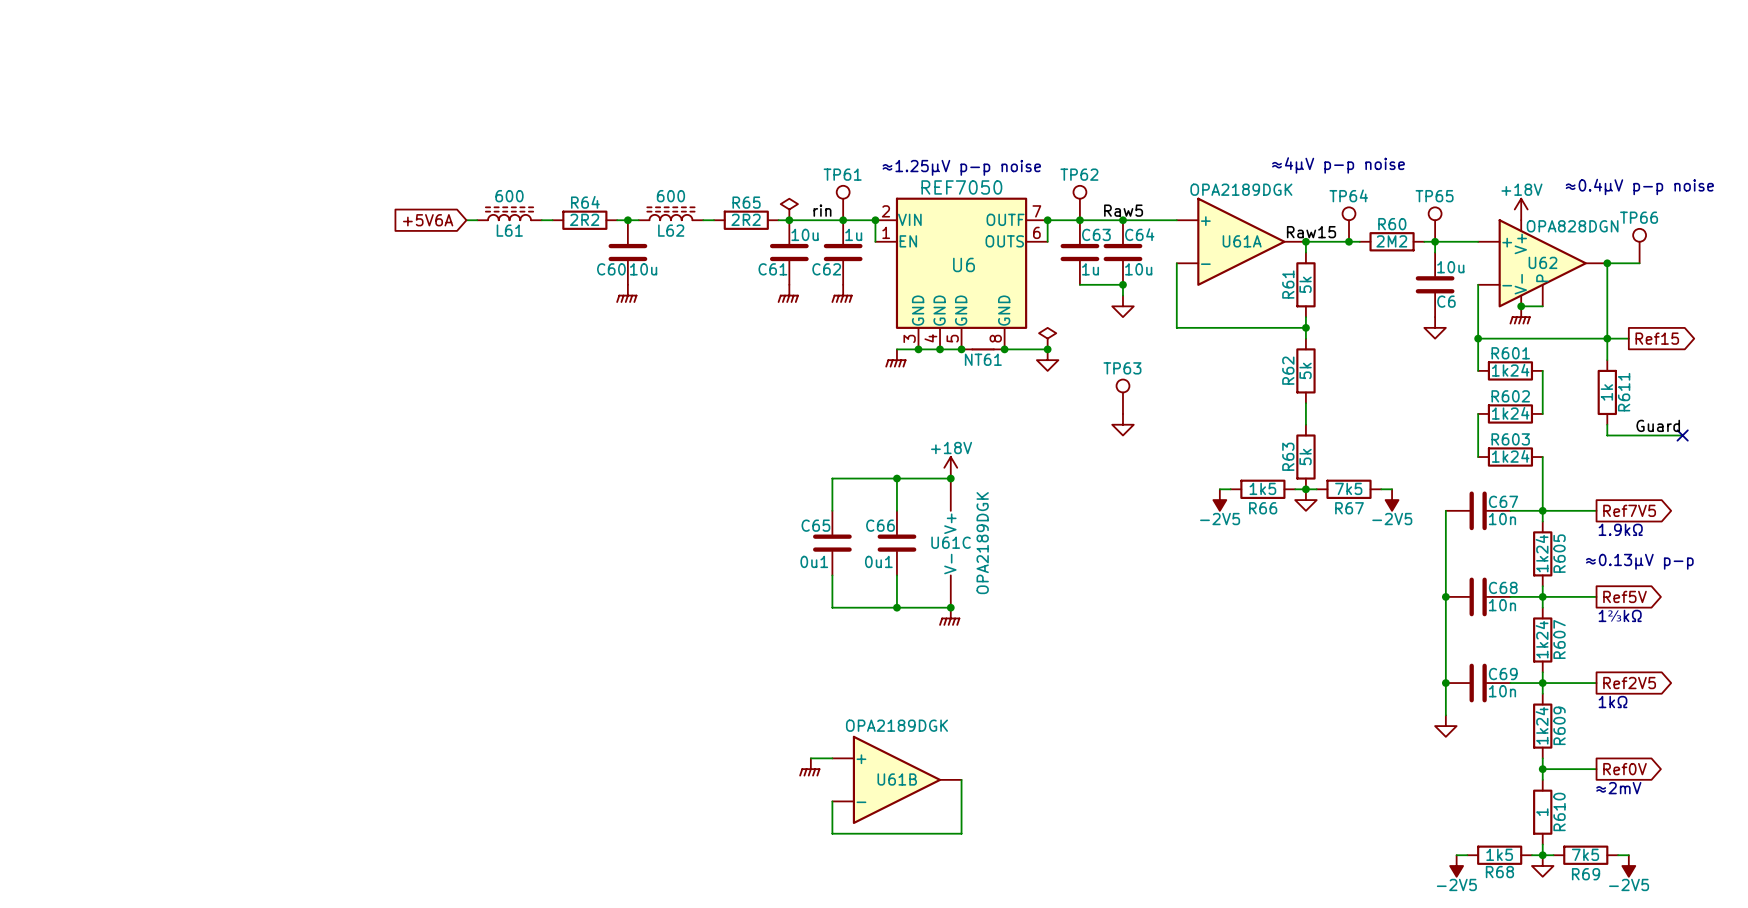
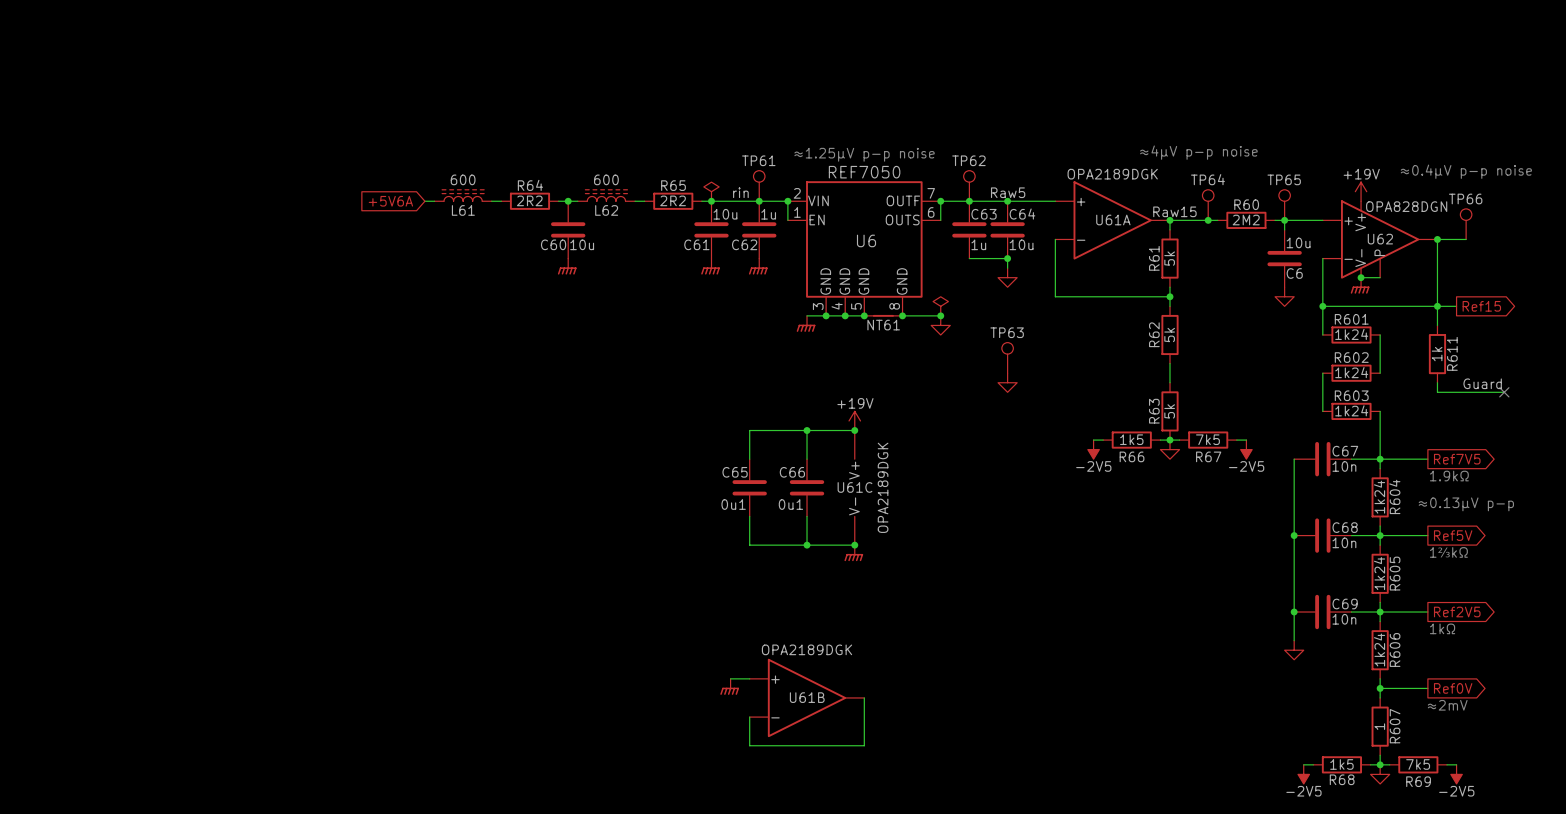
power symbol: +18V (1521, 209) -> +19V (1361, 191)
power symbol: +18V (950, 467) -> +19V (854, 420)
R605 name: R605 (1559, 553) -> R604 (1394, 496)
R607 name: R607 (1559, 639) -> R605 (1395, 573)
R609 name: R609 (1559, 725) -> R606 (1395, 649)
R610 name: R610 (1559, 811) -> R607 (1395, 726)

